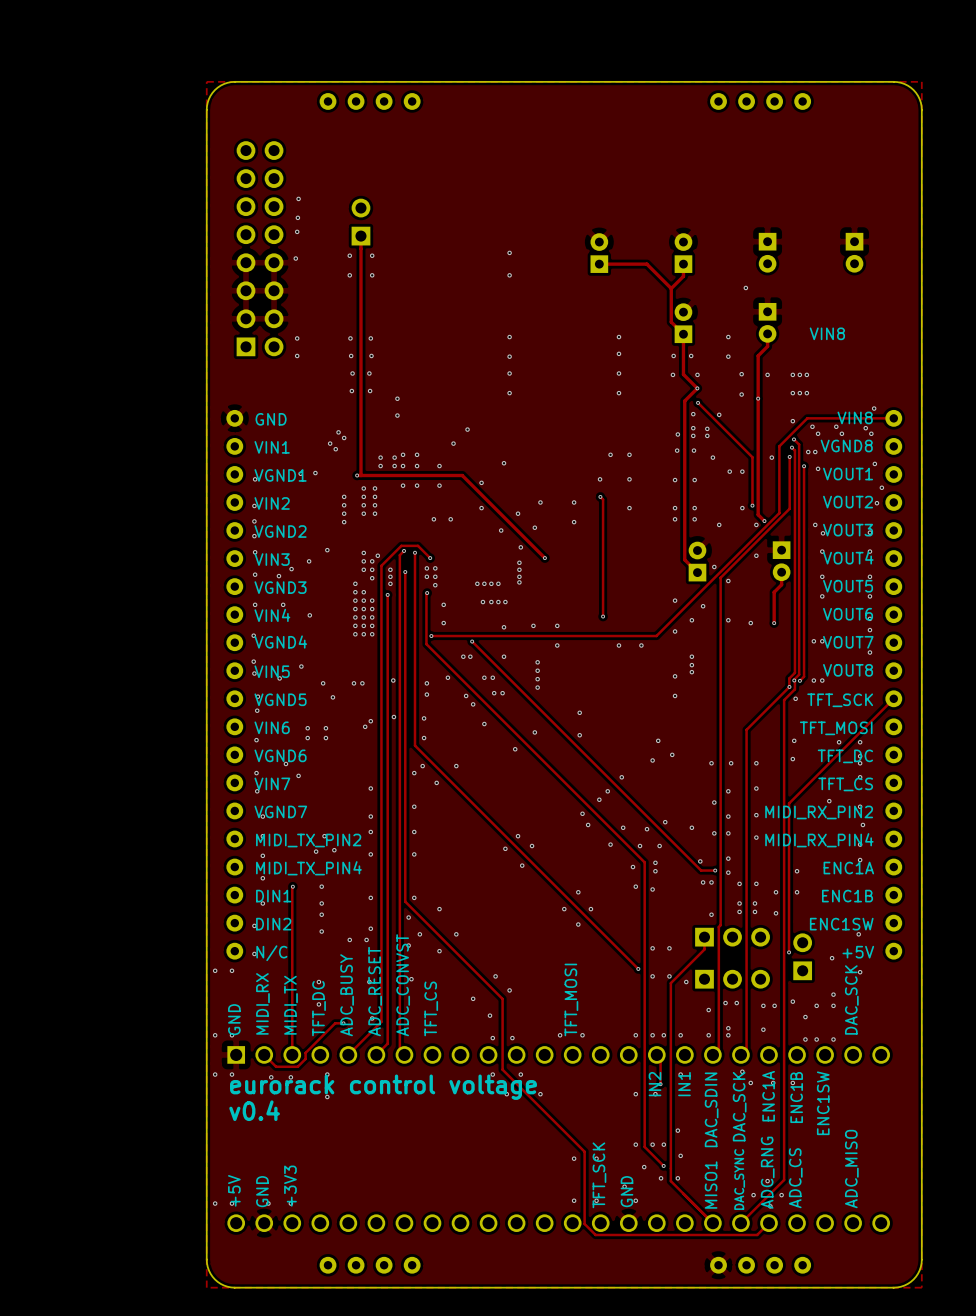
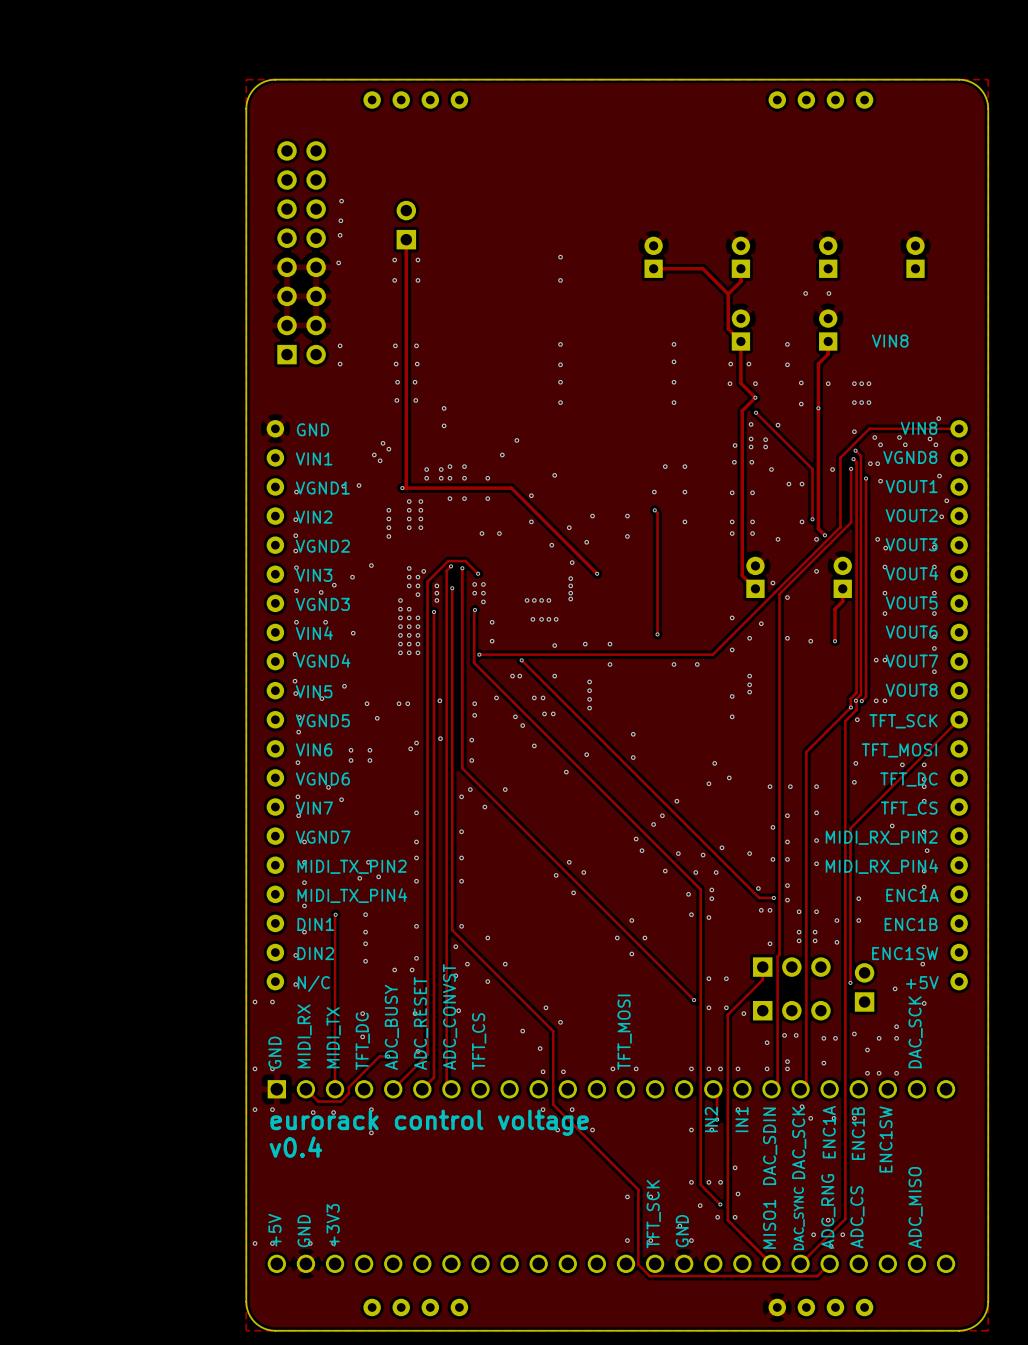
part rotation: 0° (767, 252) -> 180° (828, 257)
part rotation: 0° (854, 252) -> 180° (915, 257)
via: none -> (828, 293)
part rotation: 0° (767, 322) -> 180° (828, 330)
part rotation: 0° (781, 561) -> 180° (842, 577)

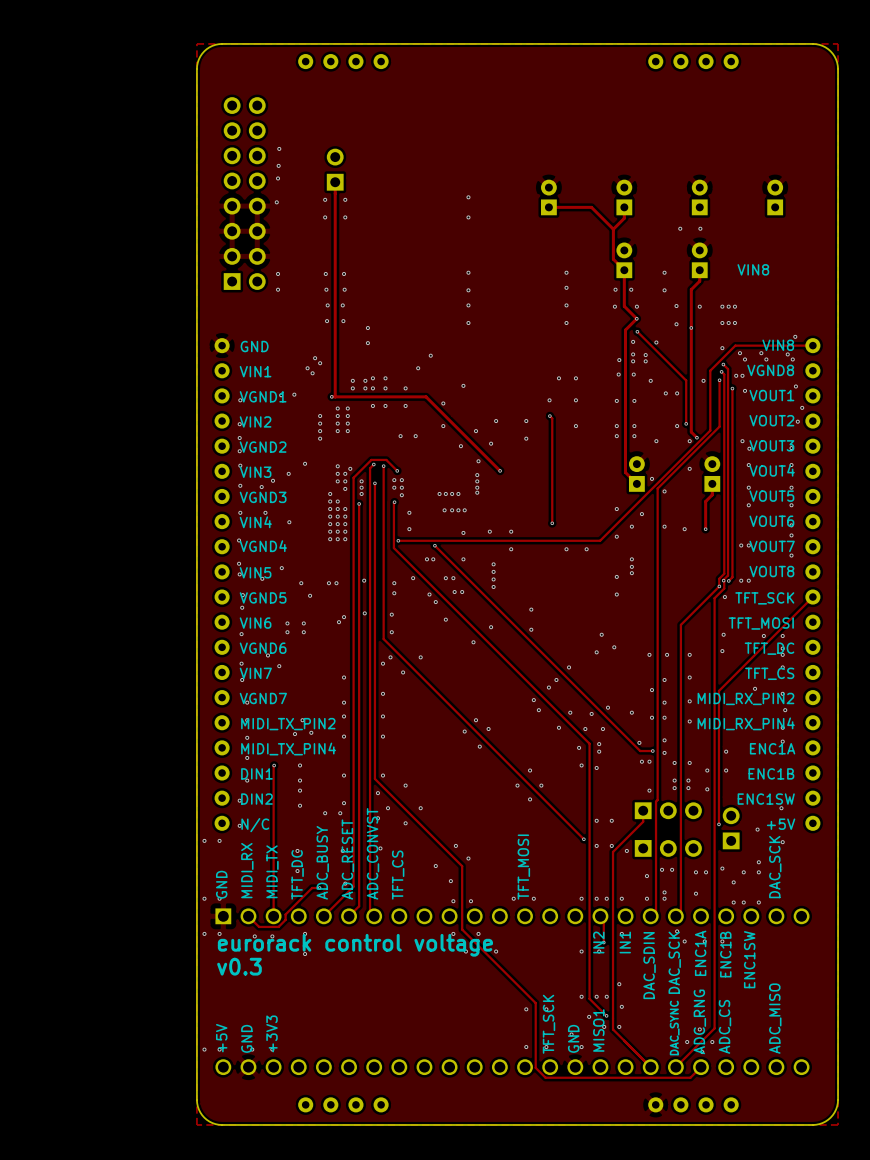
text: v0.4 (295, 1147) -> v0.3 (239, 966)
text position: MISO1 (769, 1224) -> MISO1 (598, 1030)

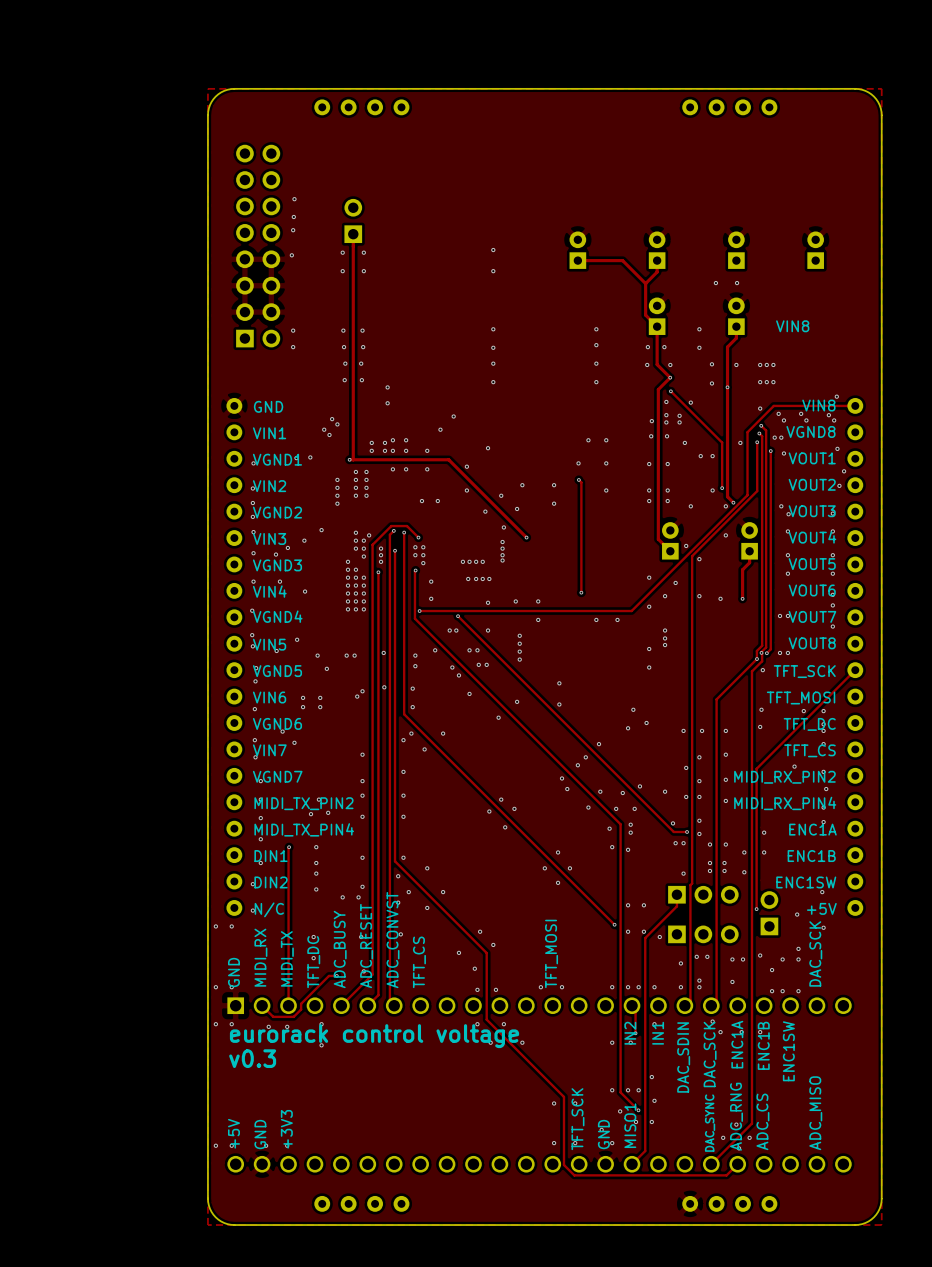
track: (613, 1029) (650, 1067) -> (645, 1124) (645, 1151) (632, 1164)

